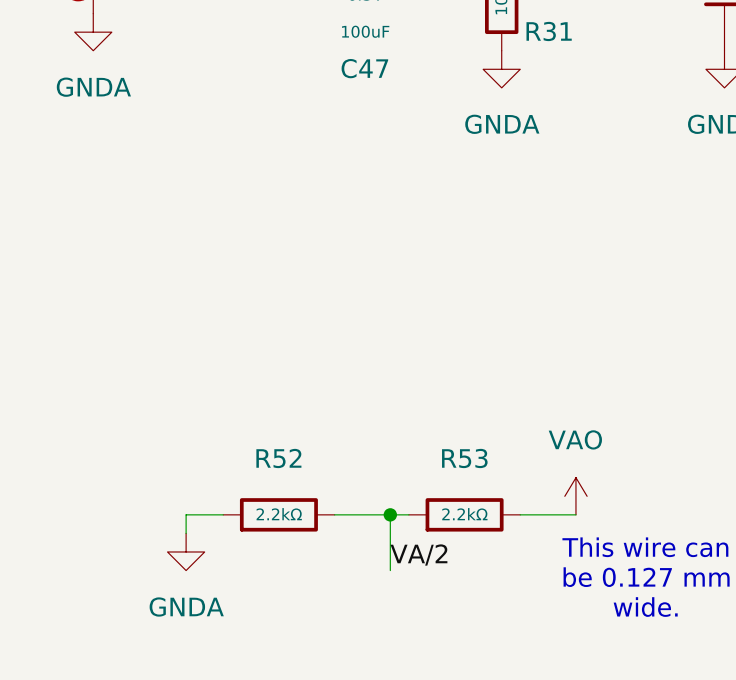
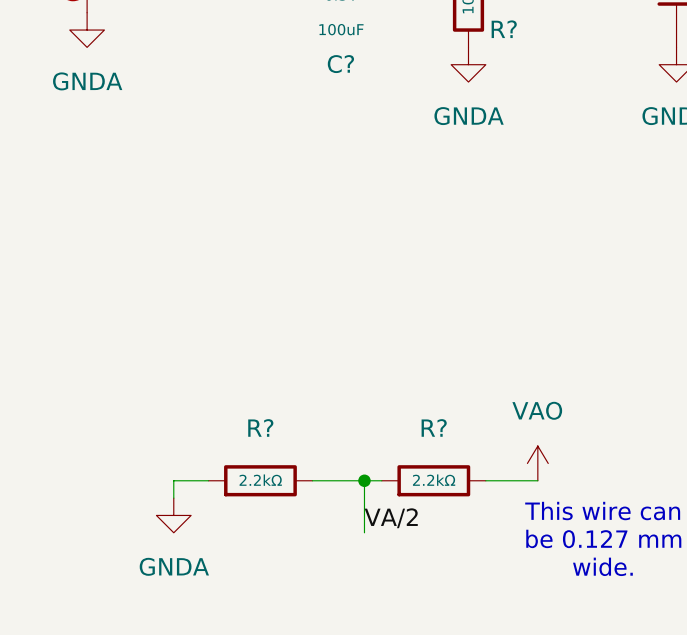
R31 name: R31 (549, 31) -> R? (504, 29)
C47 name: C47 (364, 68) -> C? (340, 64)
R52 name: R52 (278, 458) -> R? (260, 427)
R53 name: R53 (464, 458) -> R? (434, 427)

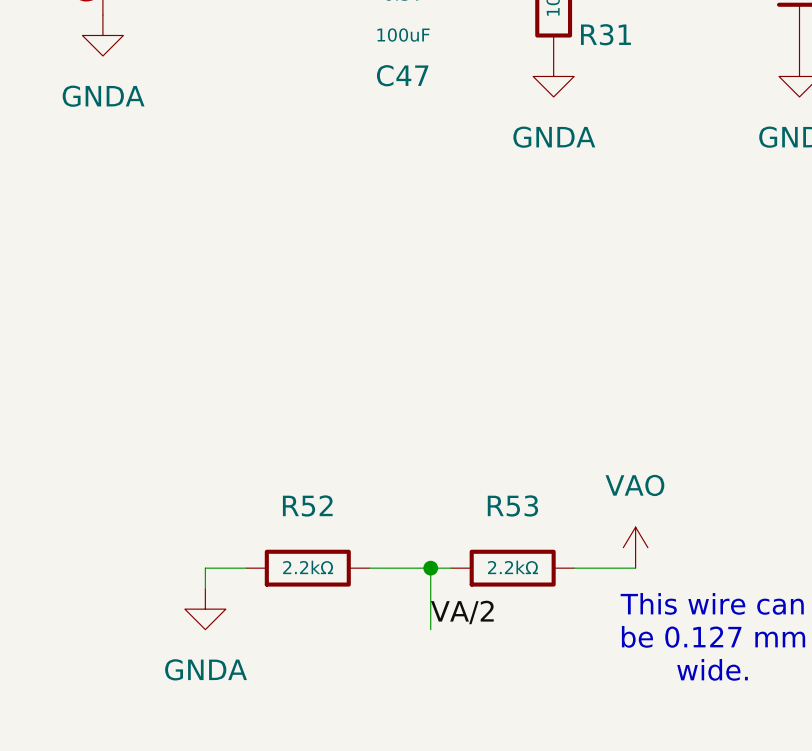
R? name: R? (504, 29) -> R31 (605, 34)
C? name: C? (340, 64) -> C47 (402, 75)
R? name: R? (260, 427) -> R52 (307, 505)
R? name: R? (434, 427) -> R53 (512, 505)

